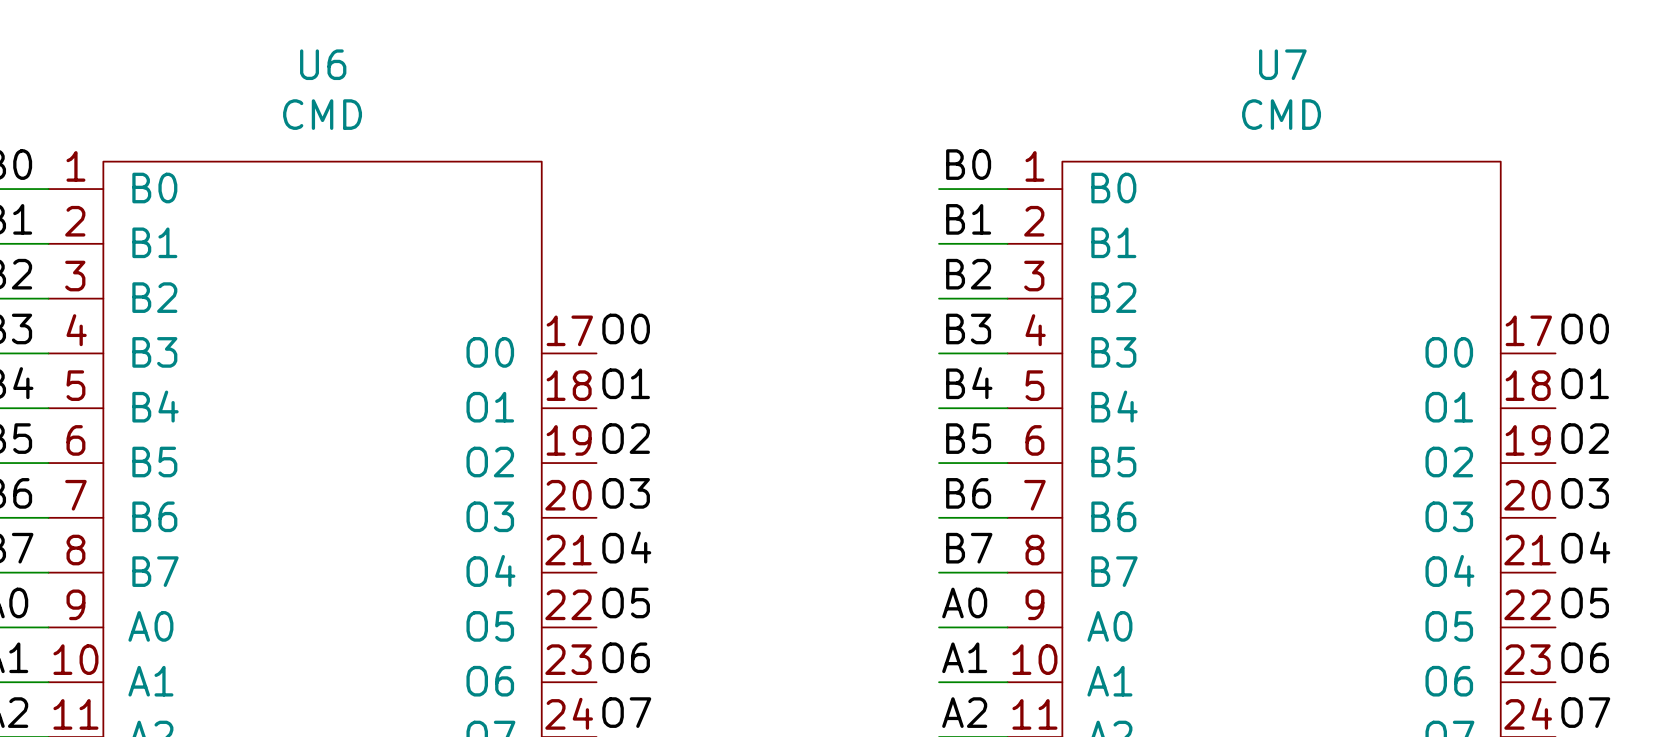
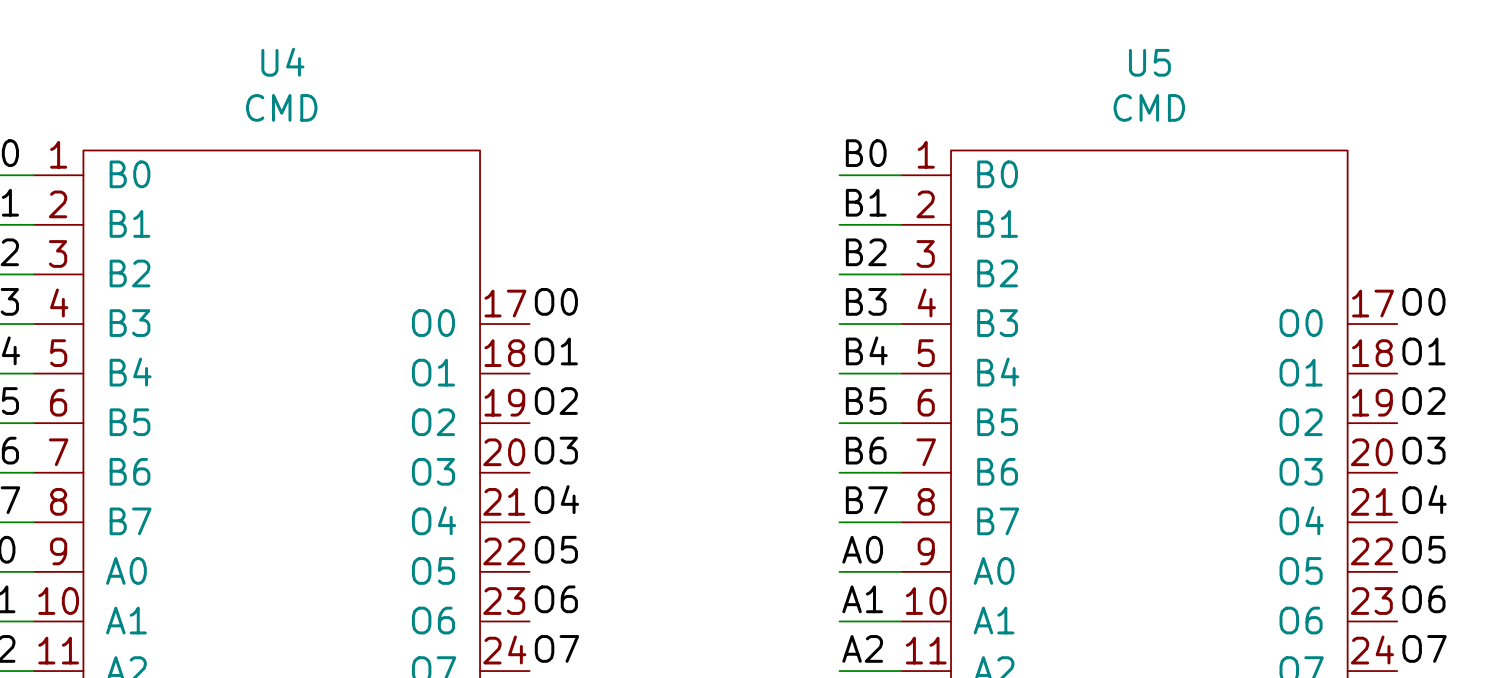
U6 name: U6 (323, 64) -> U4 (282, 62)
U7 name: U7 (1282, 64) -> U5 (1149, 62)

